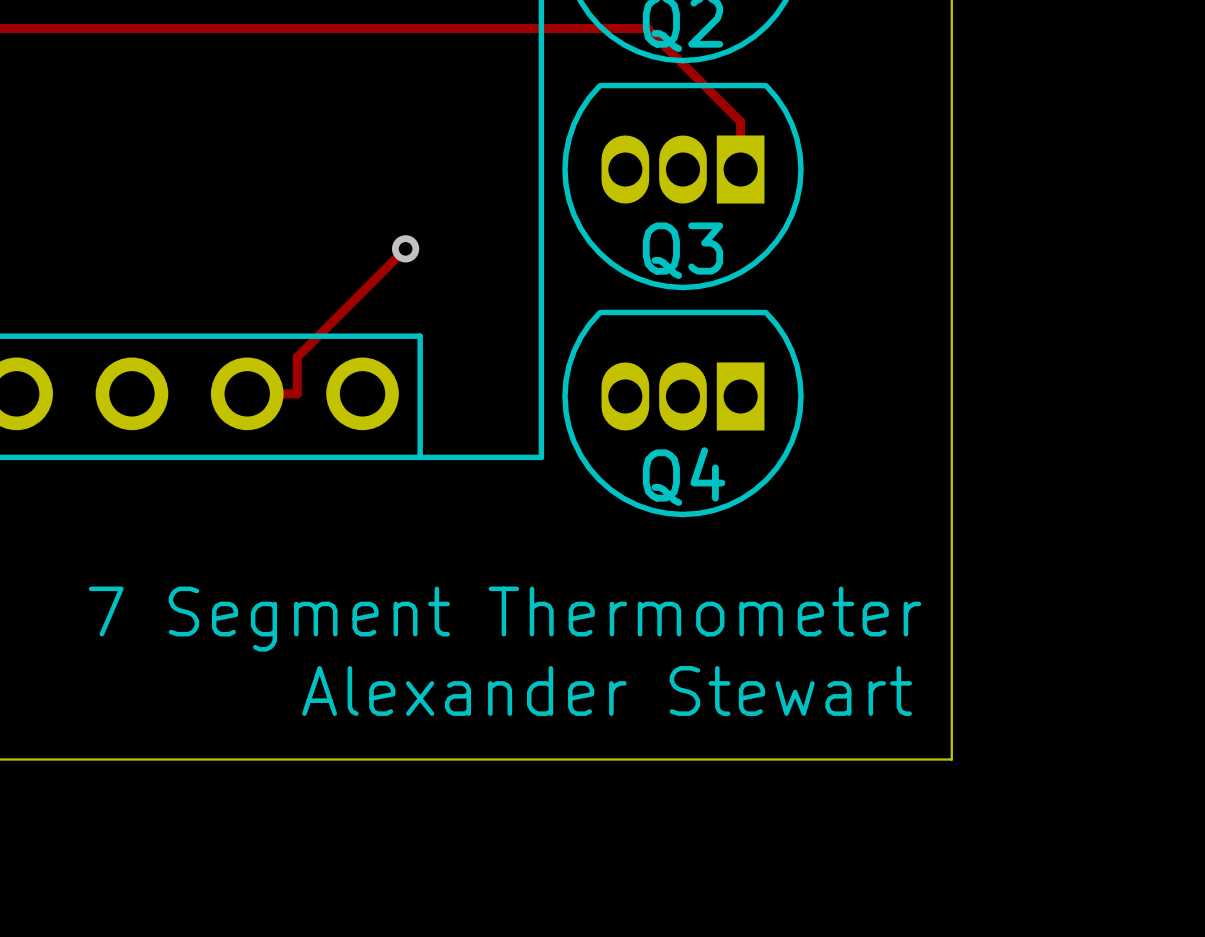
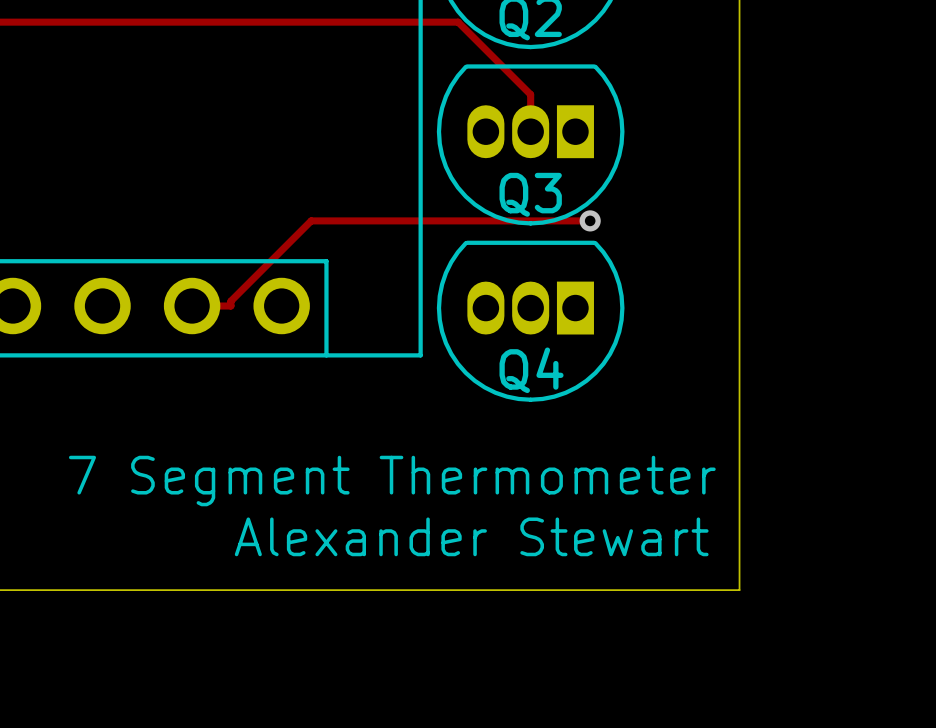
track: (589, 28) (647, 28) (740, 121) (740, 169) -> (458, 22) (530, 94) (530, 131)
track: (405, 248) (297, 357) (297, 387) -> (590, 220) (311, 220) (230, 301)
via: (405, 248) -> none
via: none -> (590, 220)

